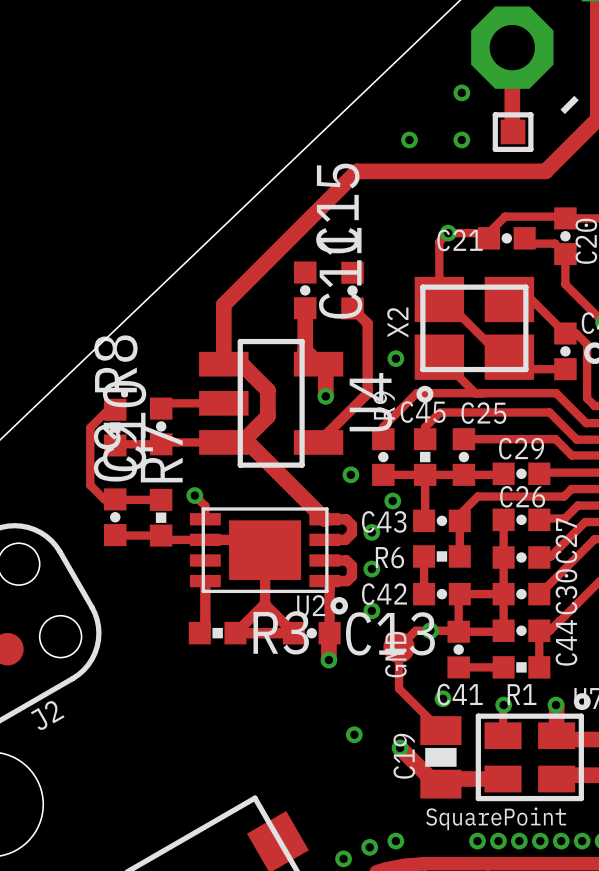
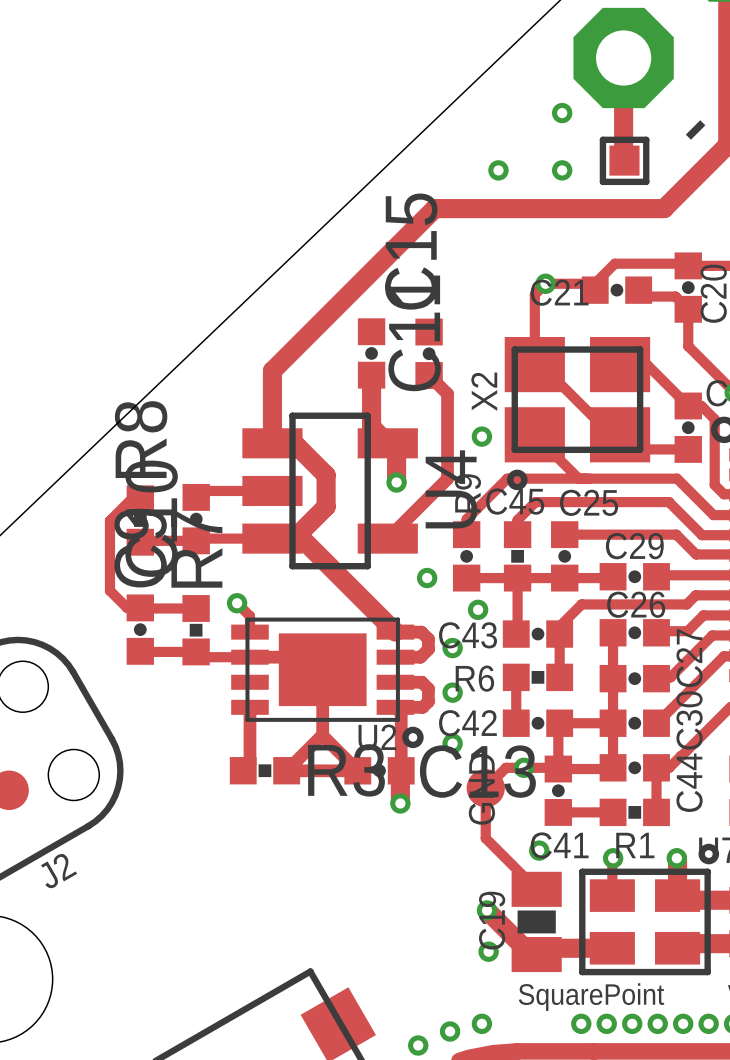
via position: (354, 734) -> (488, 951)

